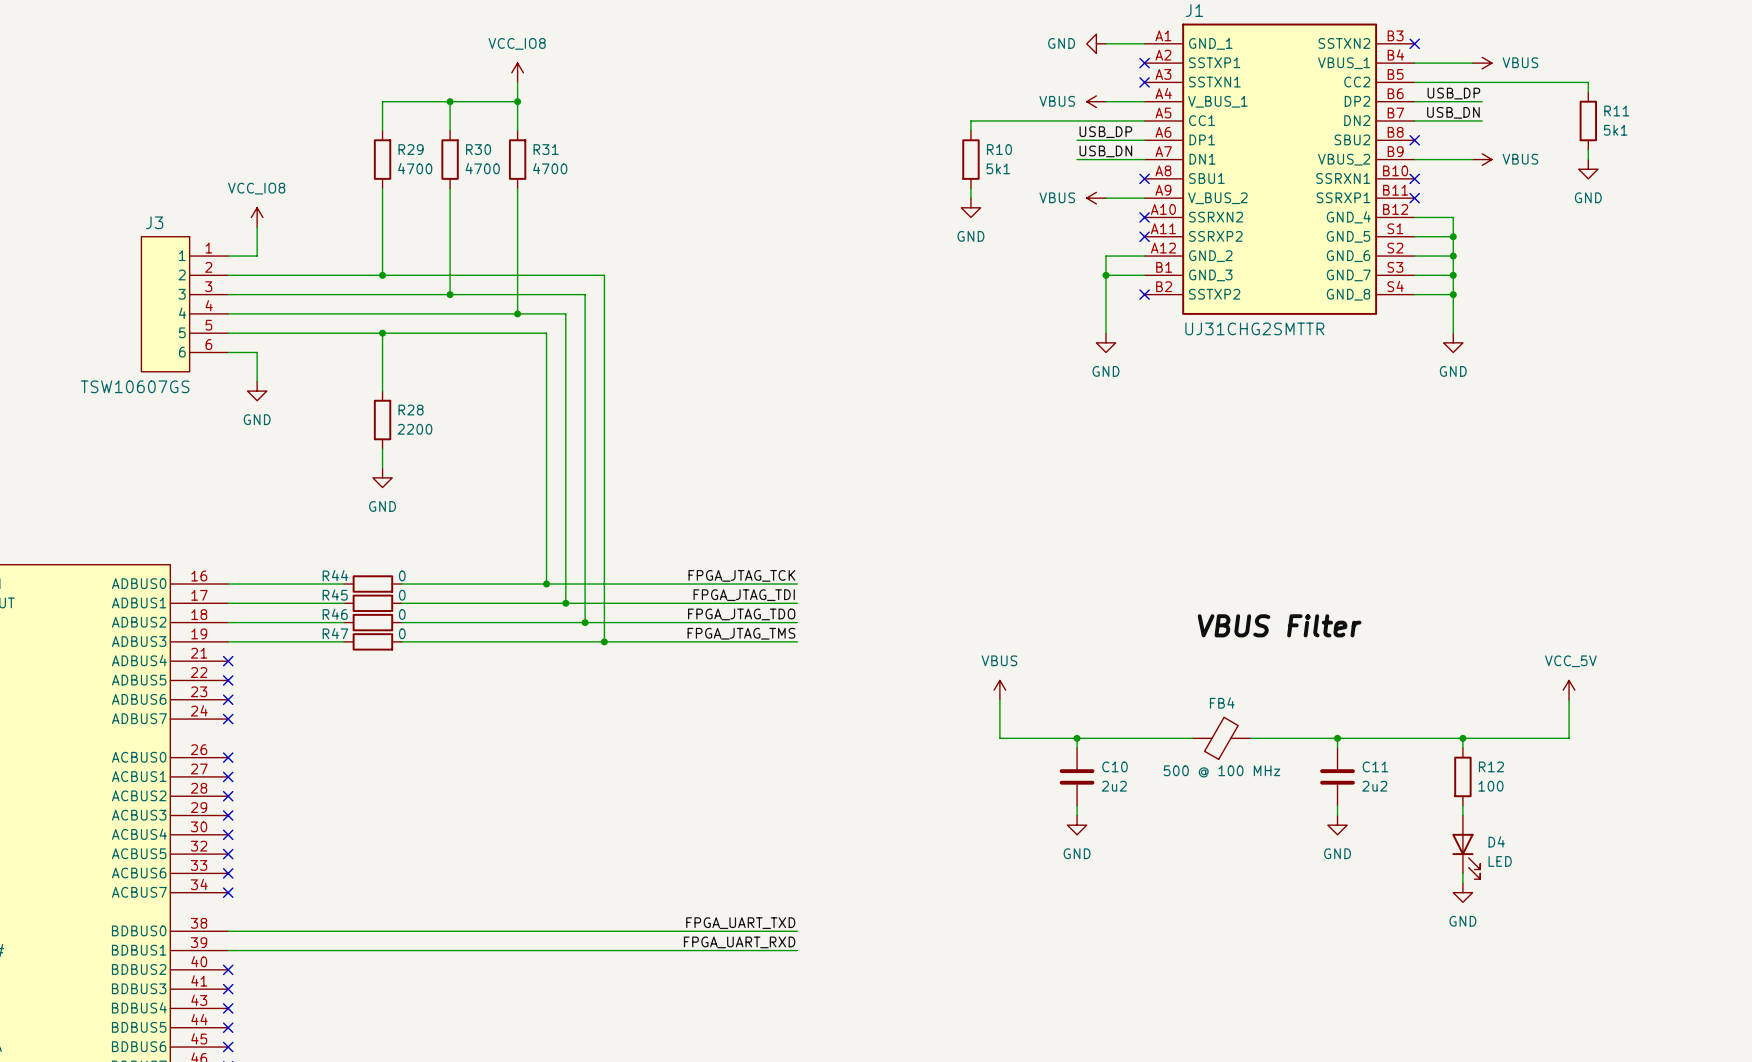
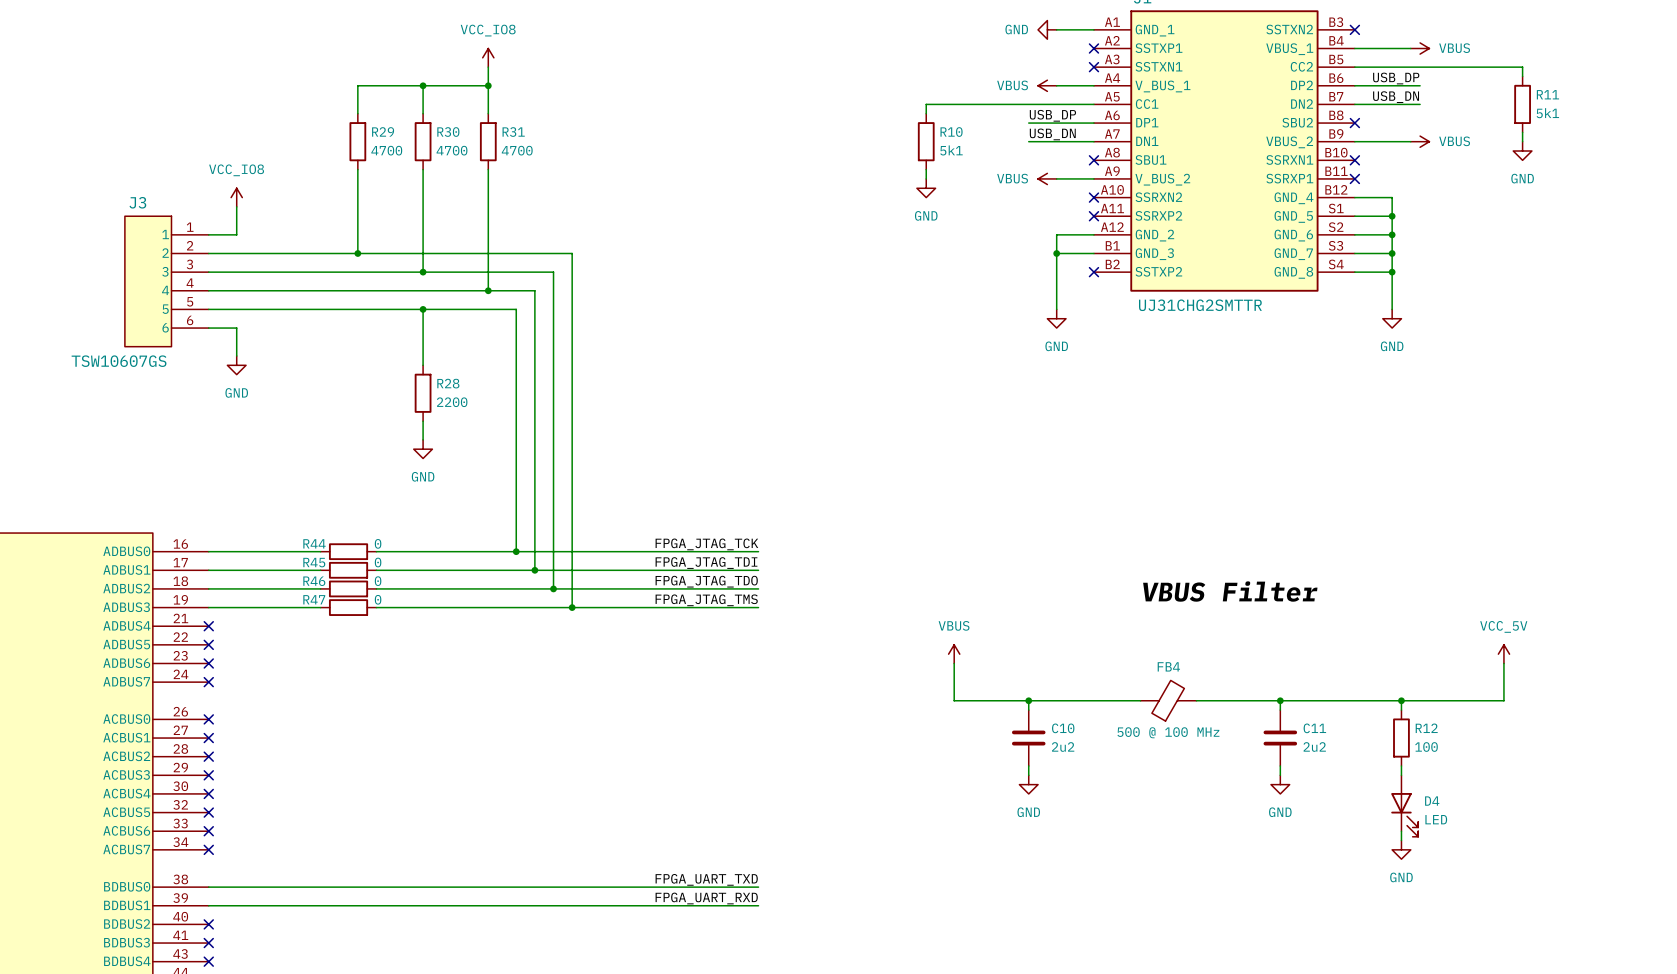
wire: (382, 333) (382, 391) -> (423, 309) (423, 365)
junction: (382, 333) -> none
junction: none -> (423, 309)
R28 position: (382, 420) -> (423, 393)
wire: (382, 448) (382, 468) -> (423, 421) (423, 439)
power symbol position: GND (382, 477) -> GND (423, 449)

